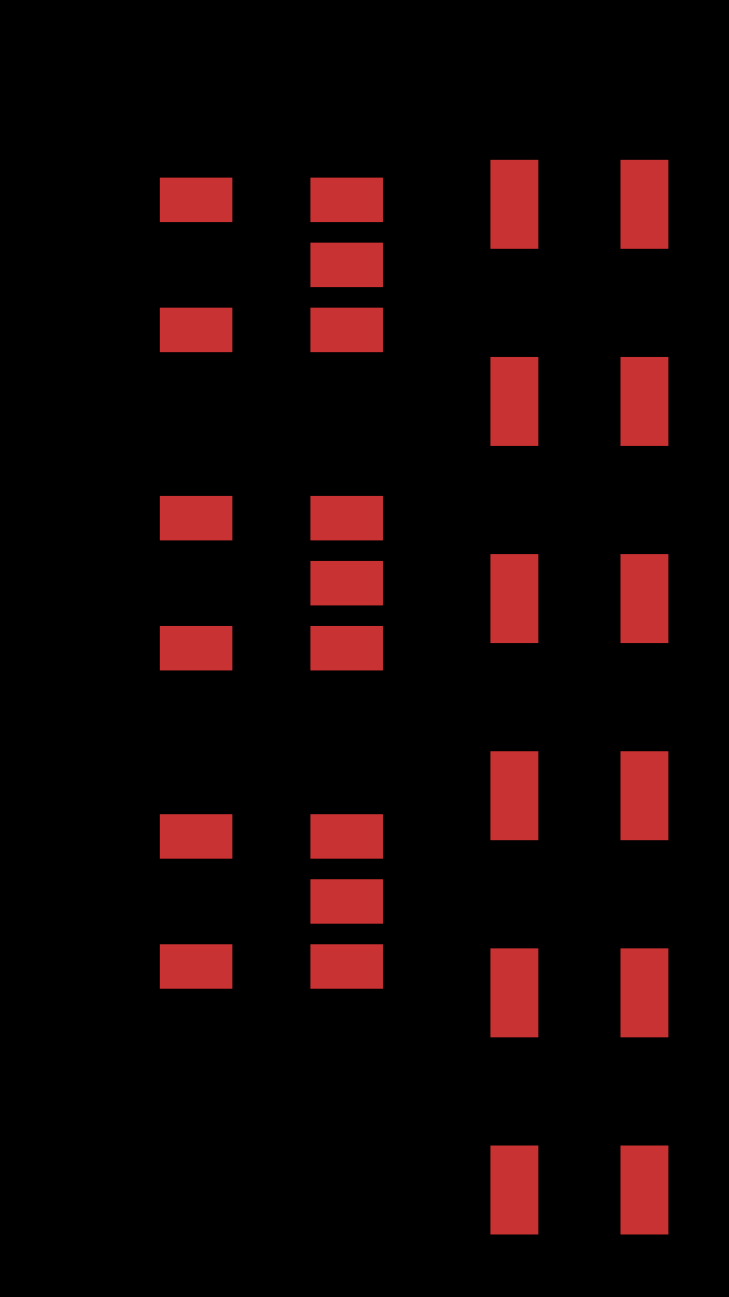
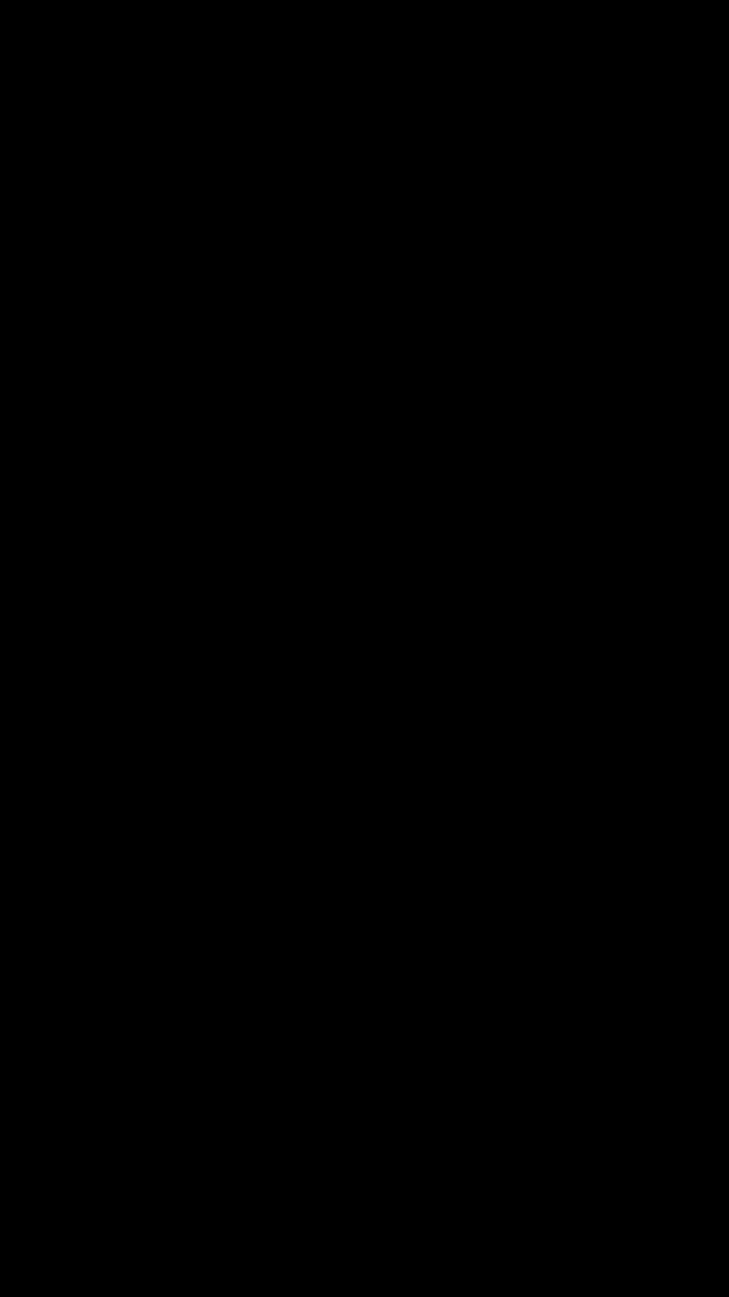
part: (579, 204) -> none
part: (271, 264) -> none
part: (579, 401) -> none
part: (271, 583) -> none
part: (579, 598) -> none
part: (579, 795) -> none
part: (271, 901) -> none
part: (579, 992) -> none
part: (579, 1189) -> none

